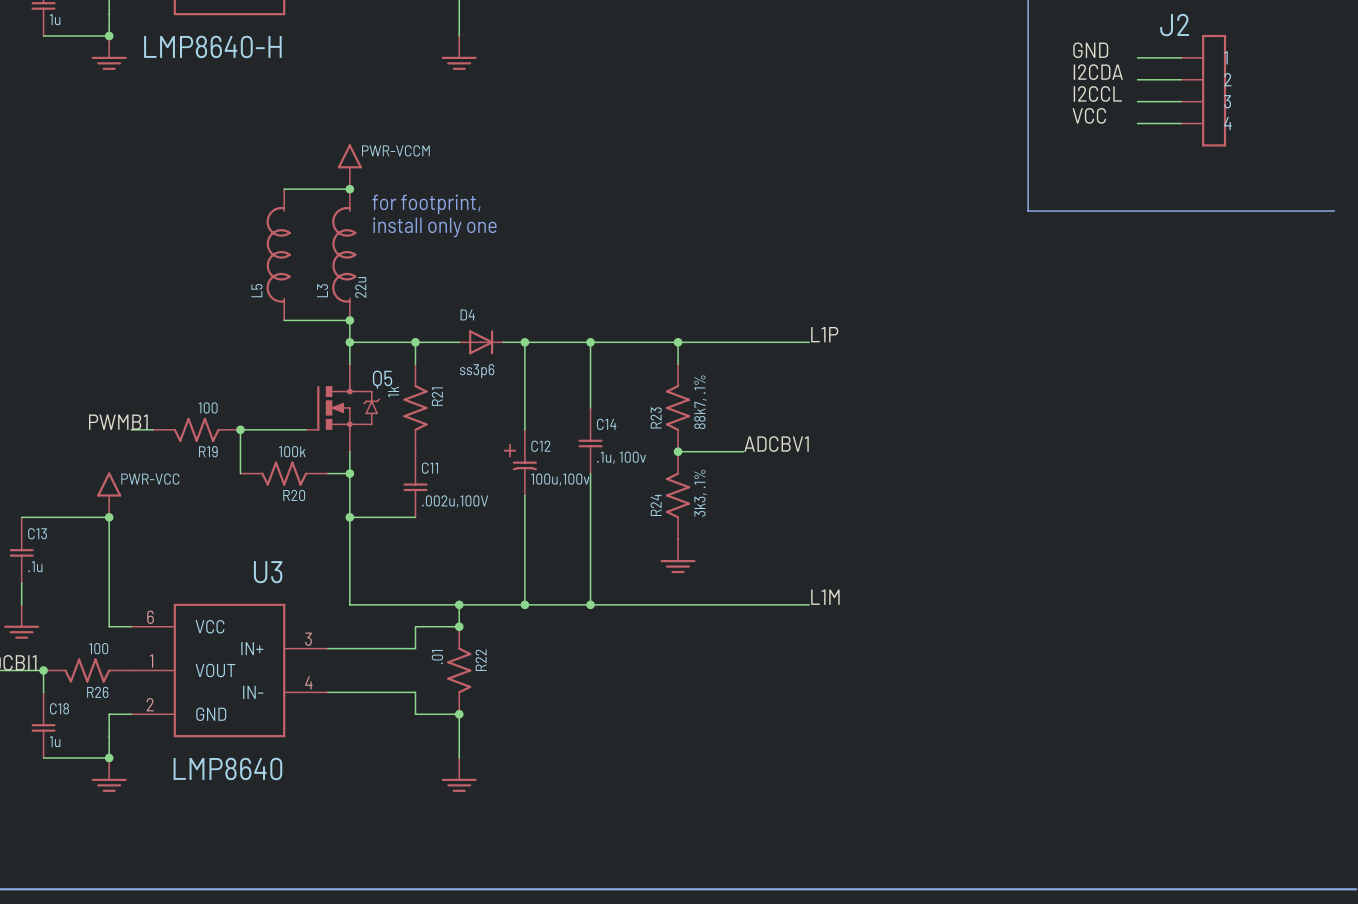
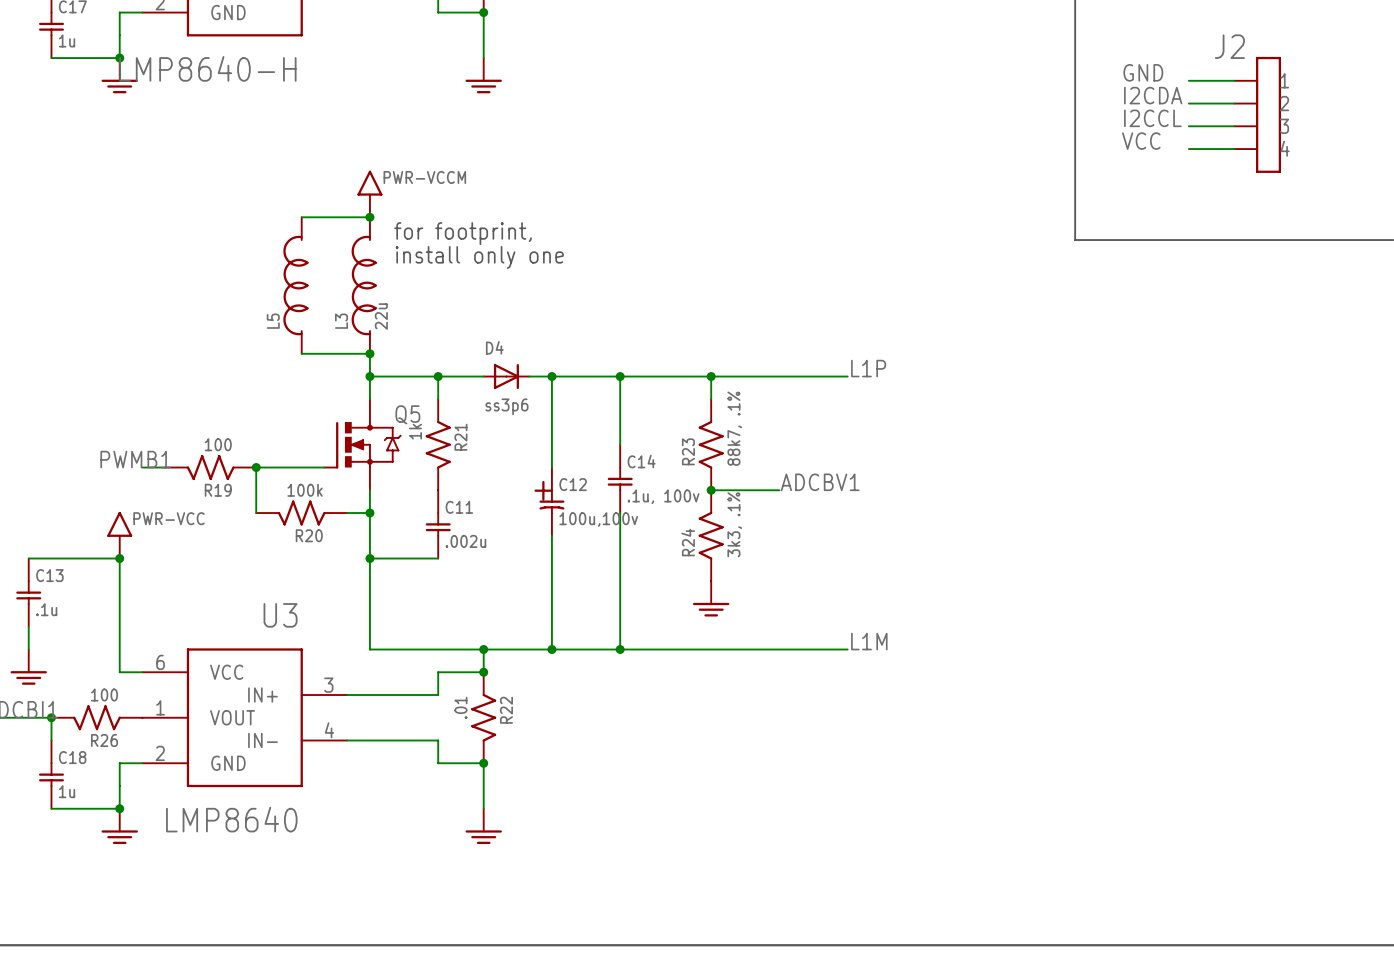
C11 value: .002u,100V (455, 501) -> .002u (465, 541)

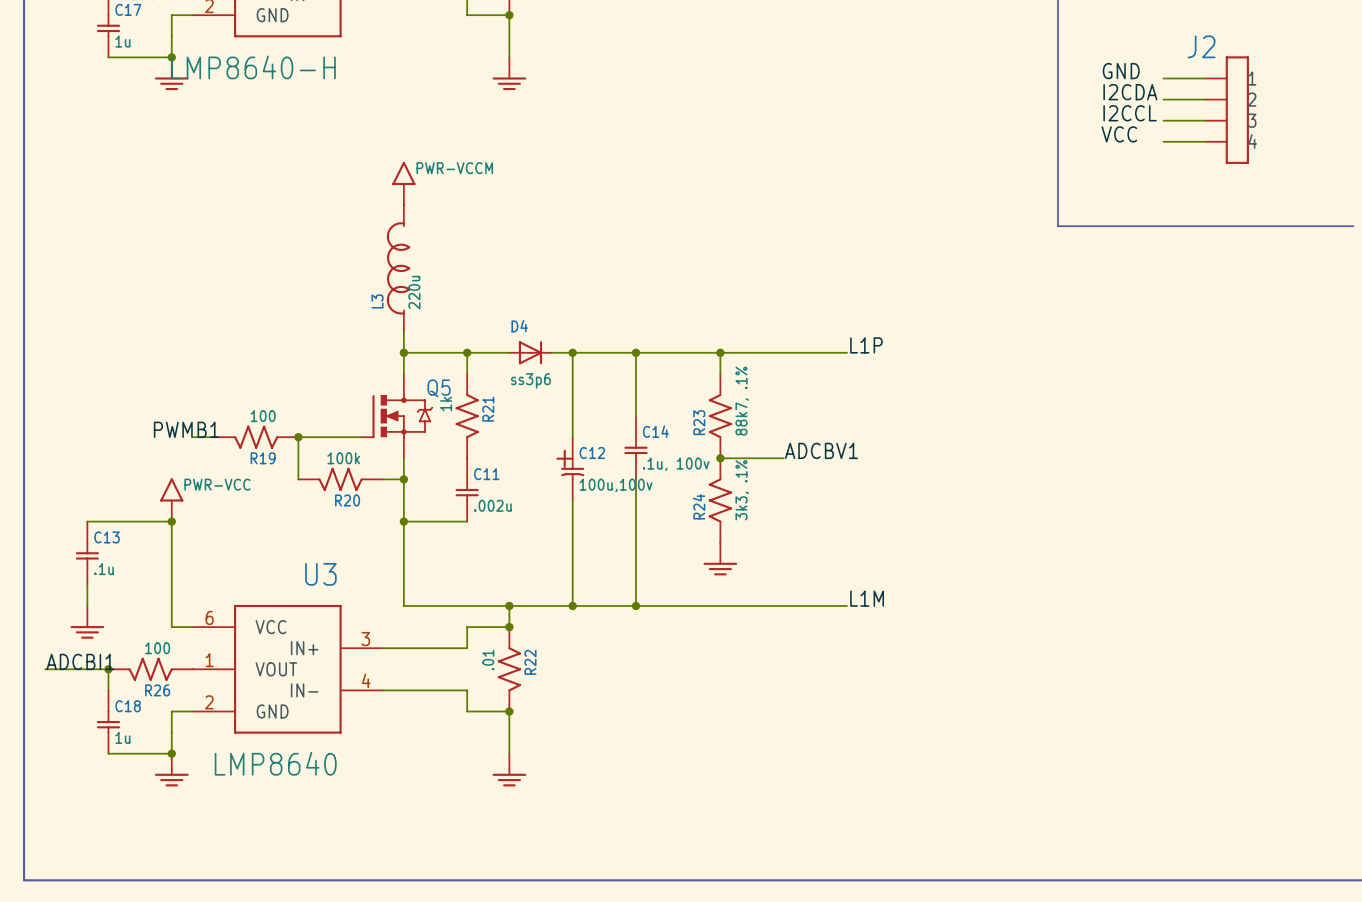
wire: (301, 217) (369, 217) -> none
junction: (369, 217) -> none
text: for footprint, (463, 233) -> none
text: install only one (479, 257) -> none
L5: (295, 285) -> none
L3 value: 22u (381, 316) -> 220u (414, 292)
wire: (301, 353) (369, 353) -> none
junction: (369, 353) -> none

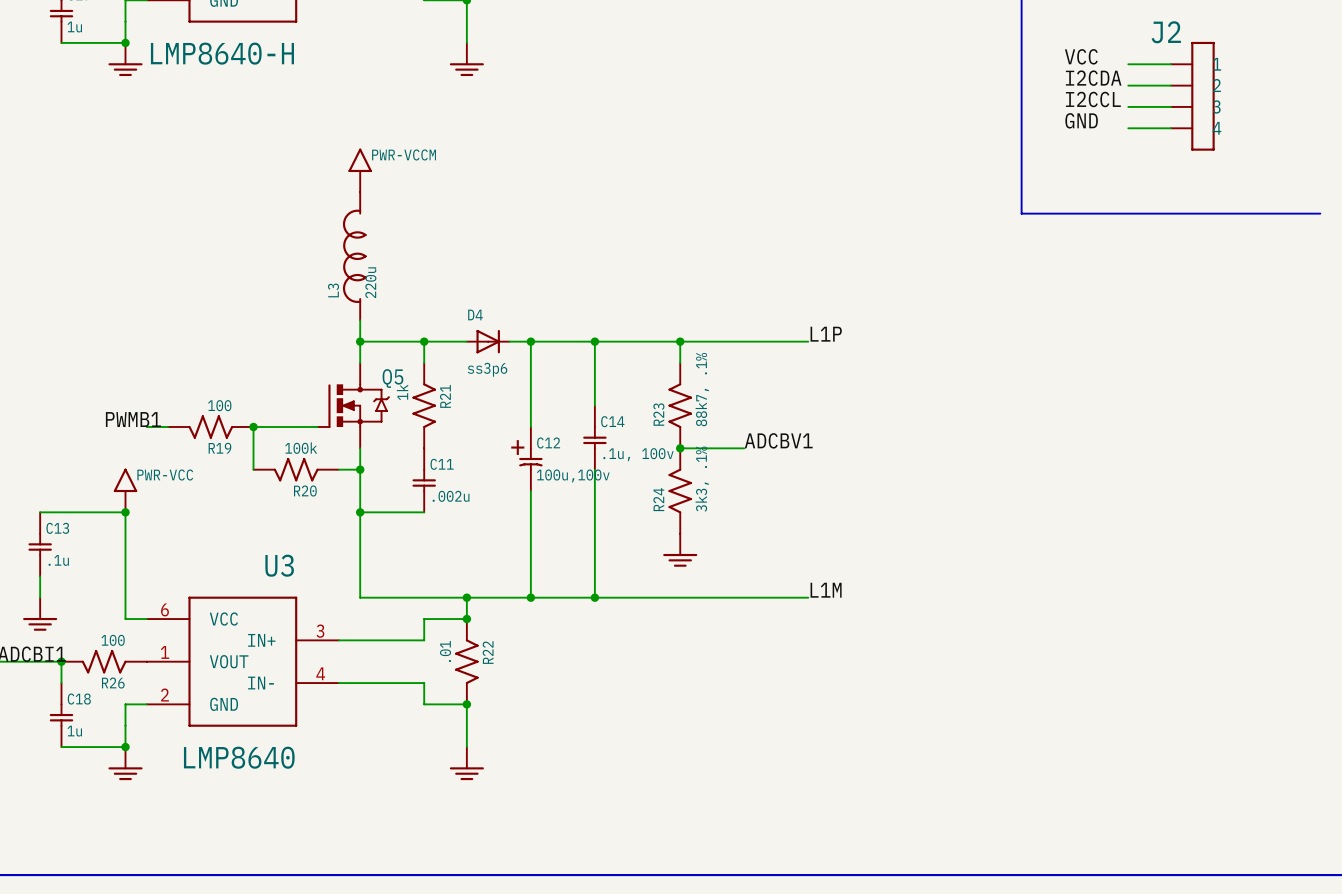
label: GND (1121, 71) -> VCC (1081, 56)
label: VCC (1119, 134) -> GND (1081, 120)

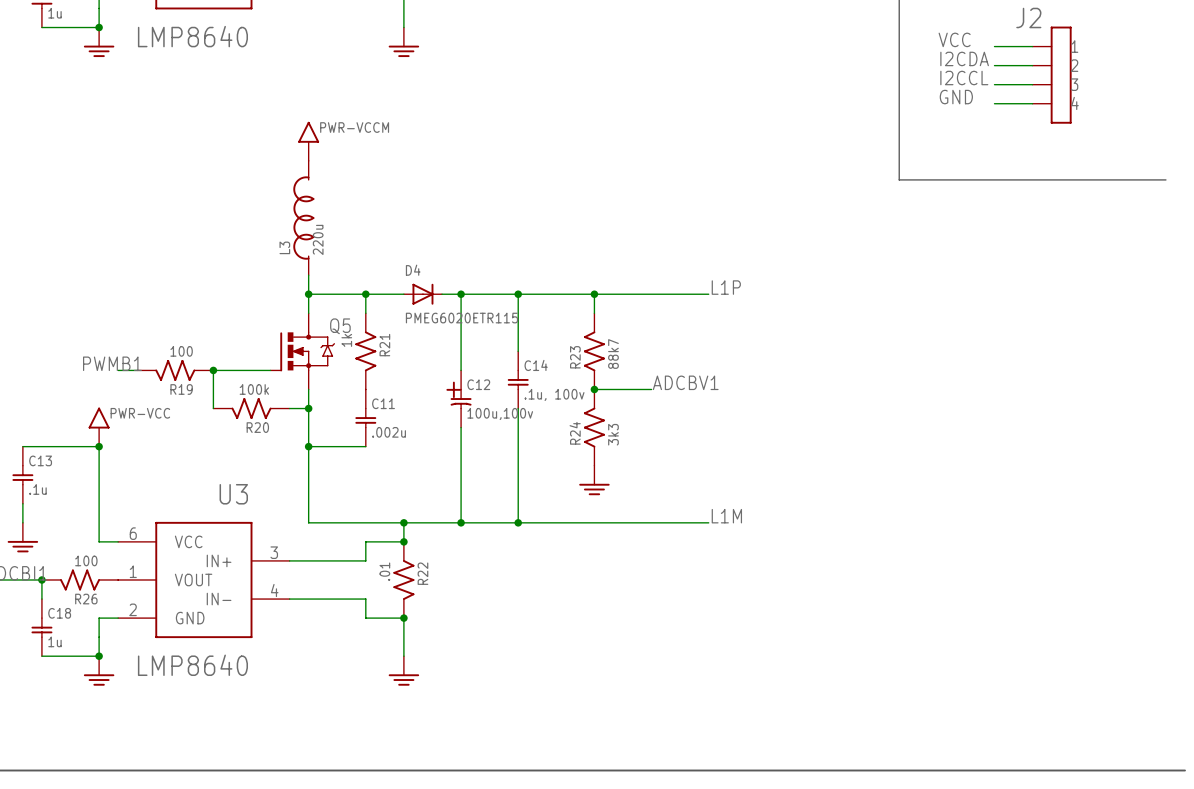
part value: LMP8640-H (222, 53) -> LMP8640 (192, 36)
D4 value: ss3p6 (487, 369) -> PMEG6020ETR115 (461, 318)
R23 value: 88k7, .1% (702, 389) -> 88k7 (613, 354)
R24 value: 3k3, .1% (702, 479) -> 3k3 (613, 434)

